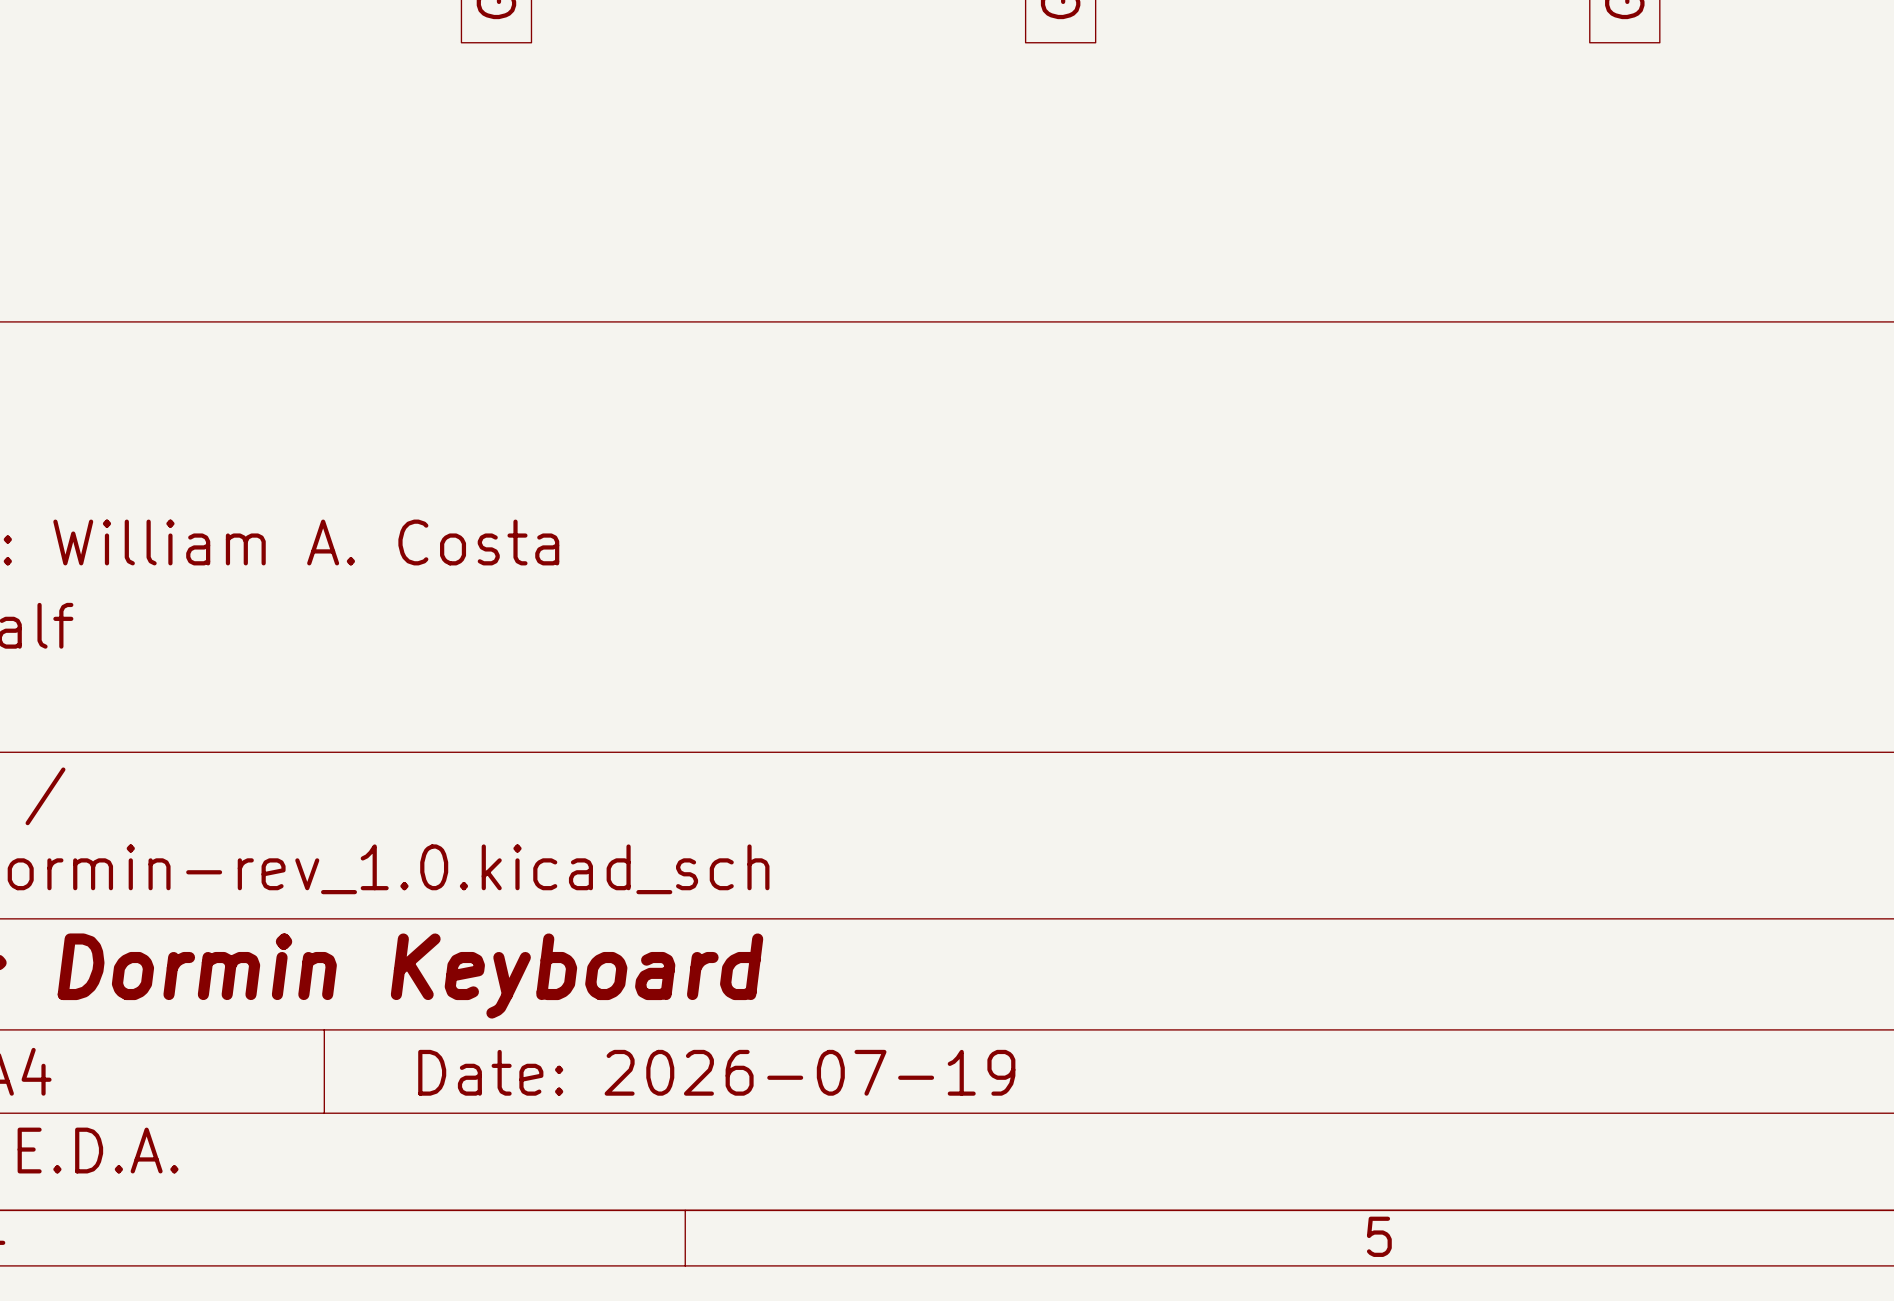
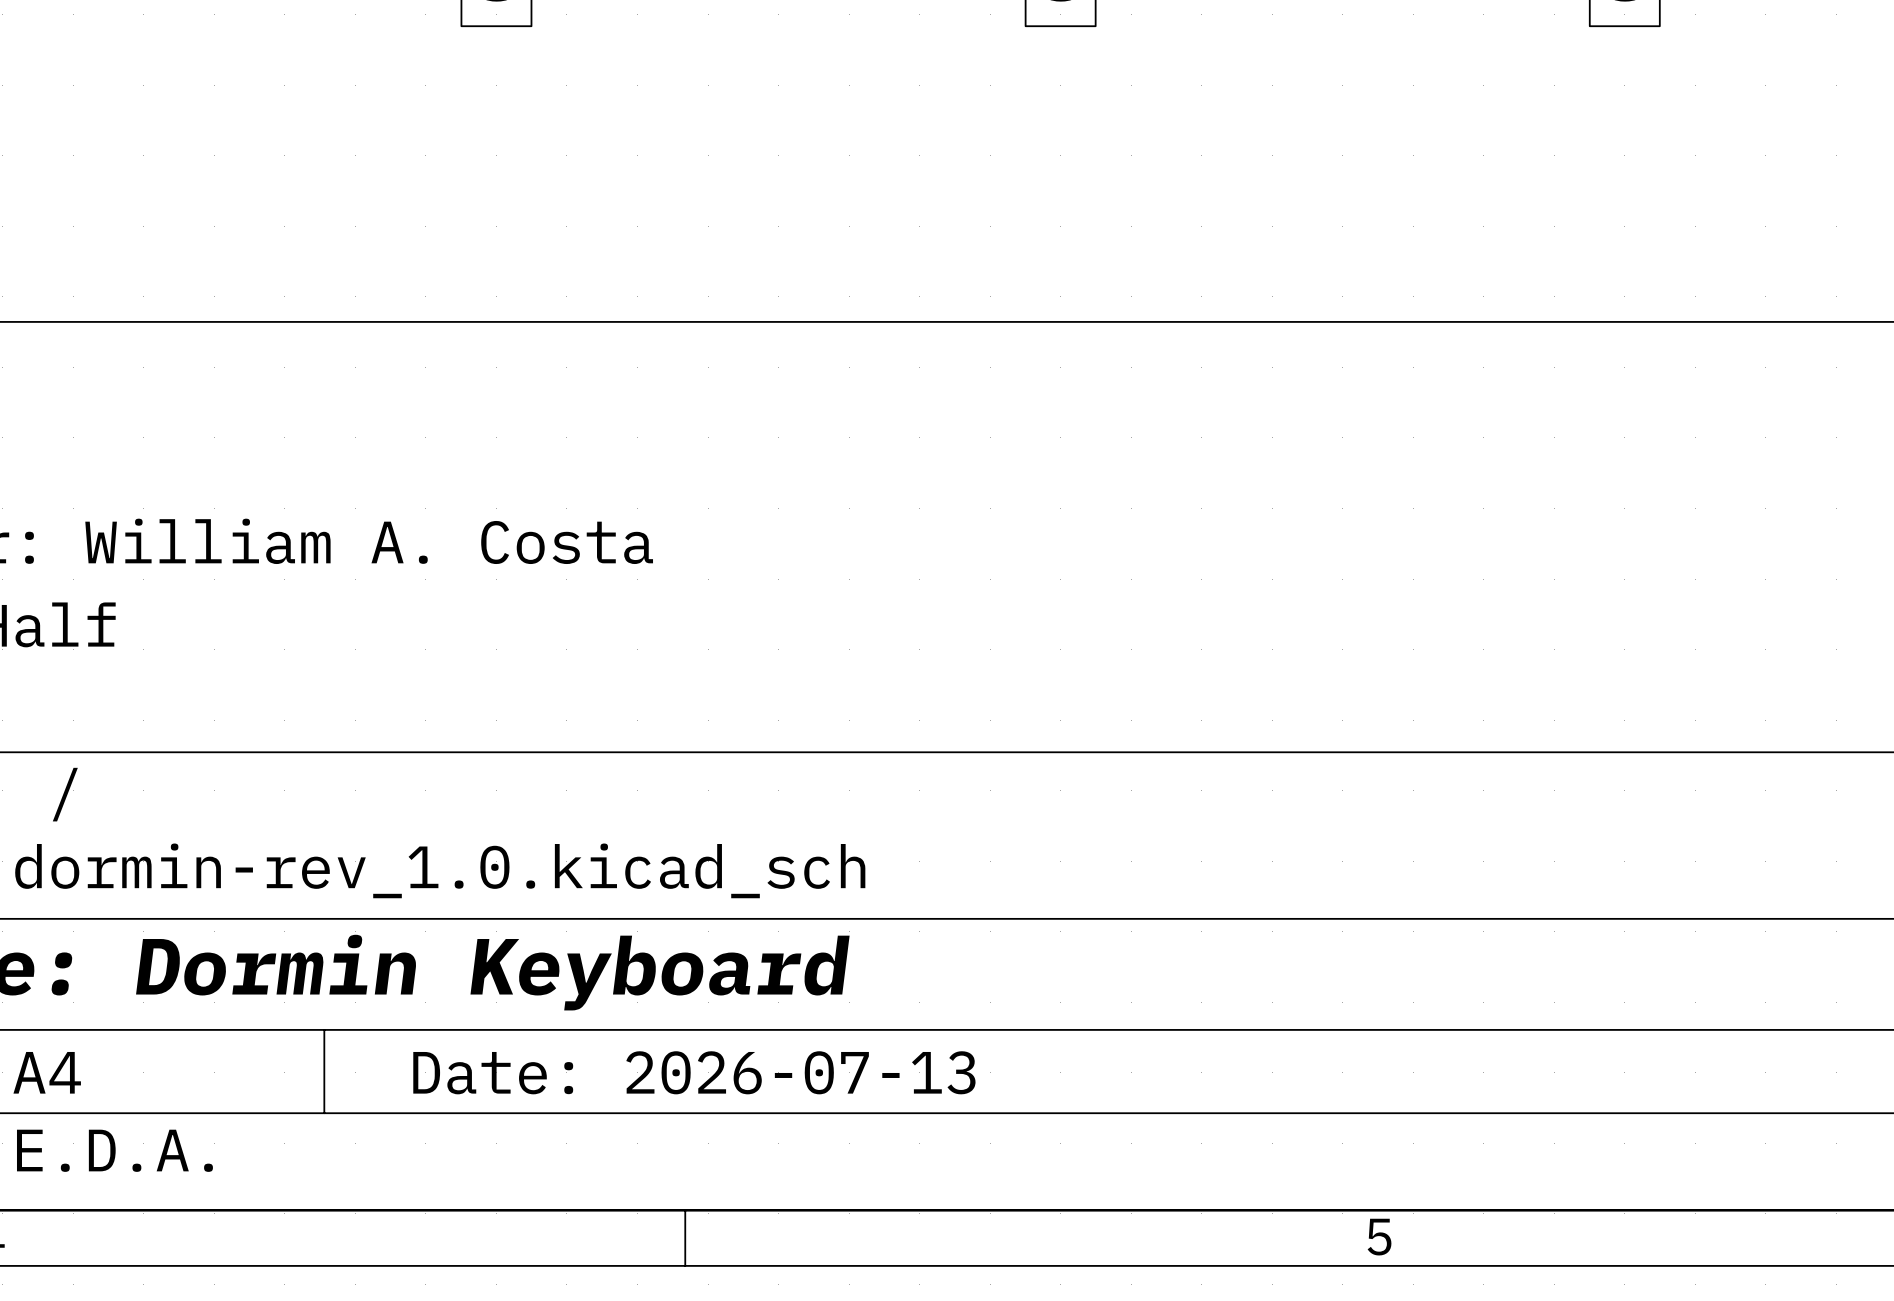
title block: Date: 2026-07-19 (716, 1072) -> Date: 2026-07-13 (694, 1072)

